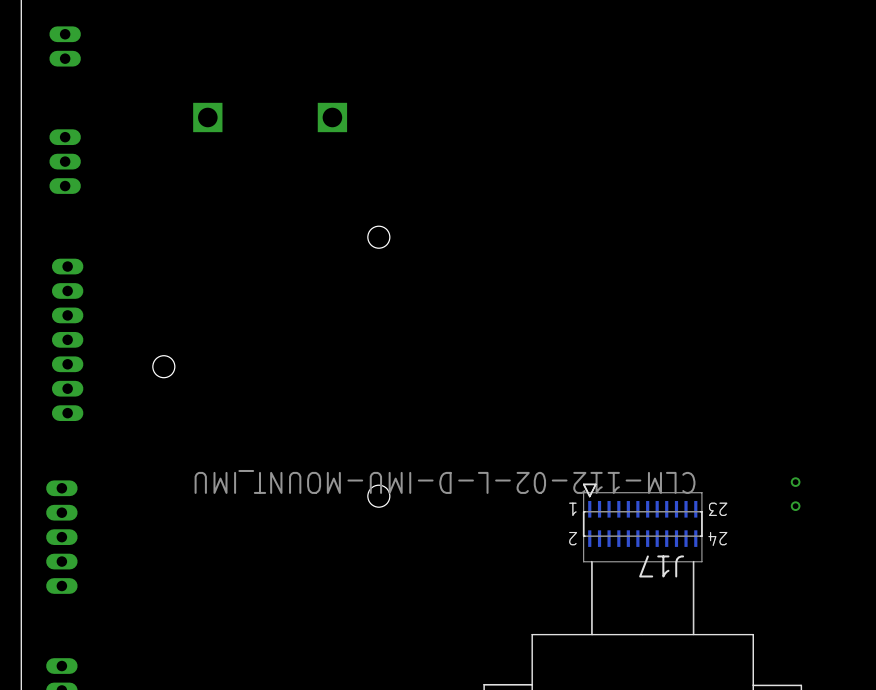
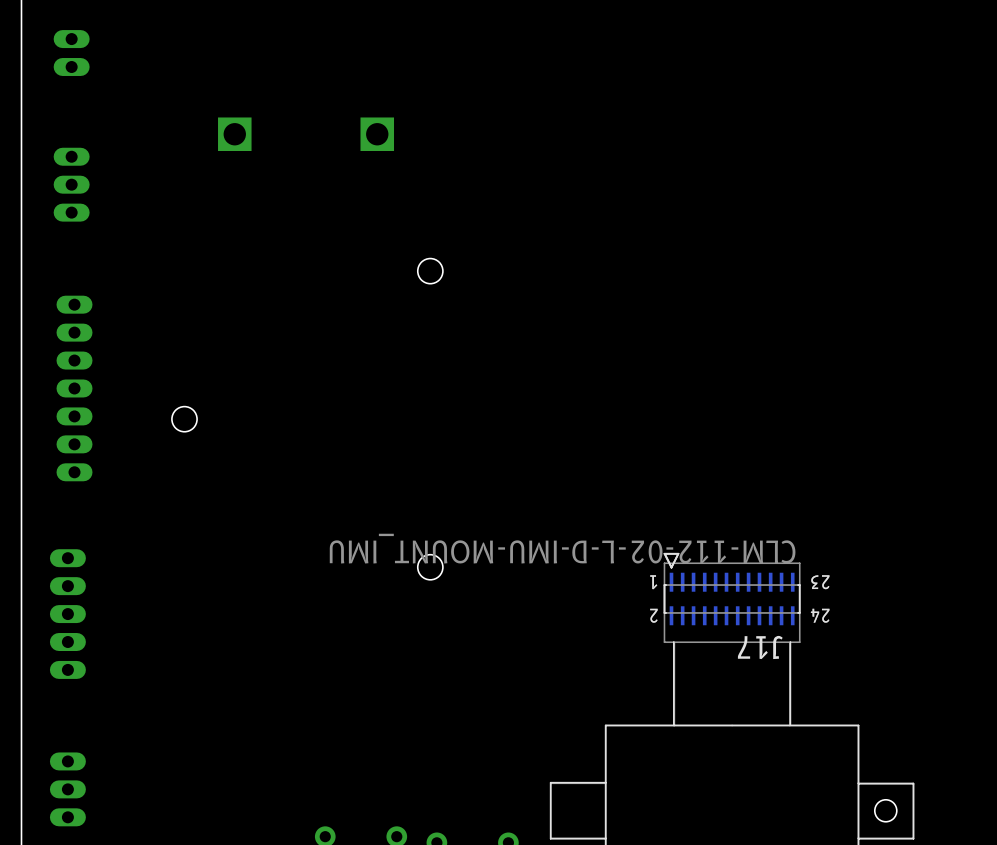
via: (795, 482) -> none
via: (795, 506) -> none

